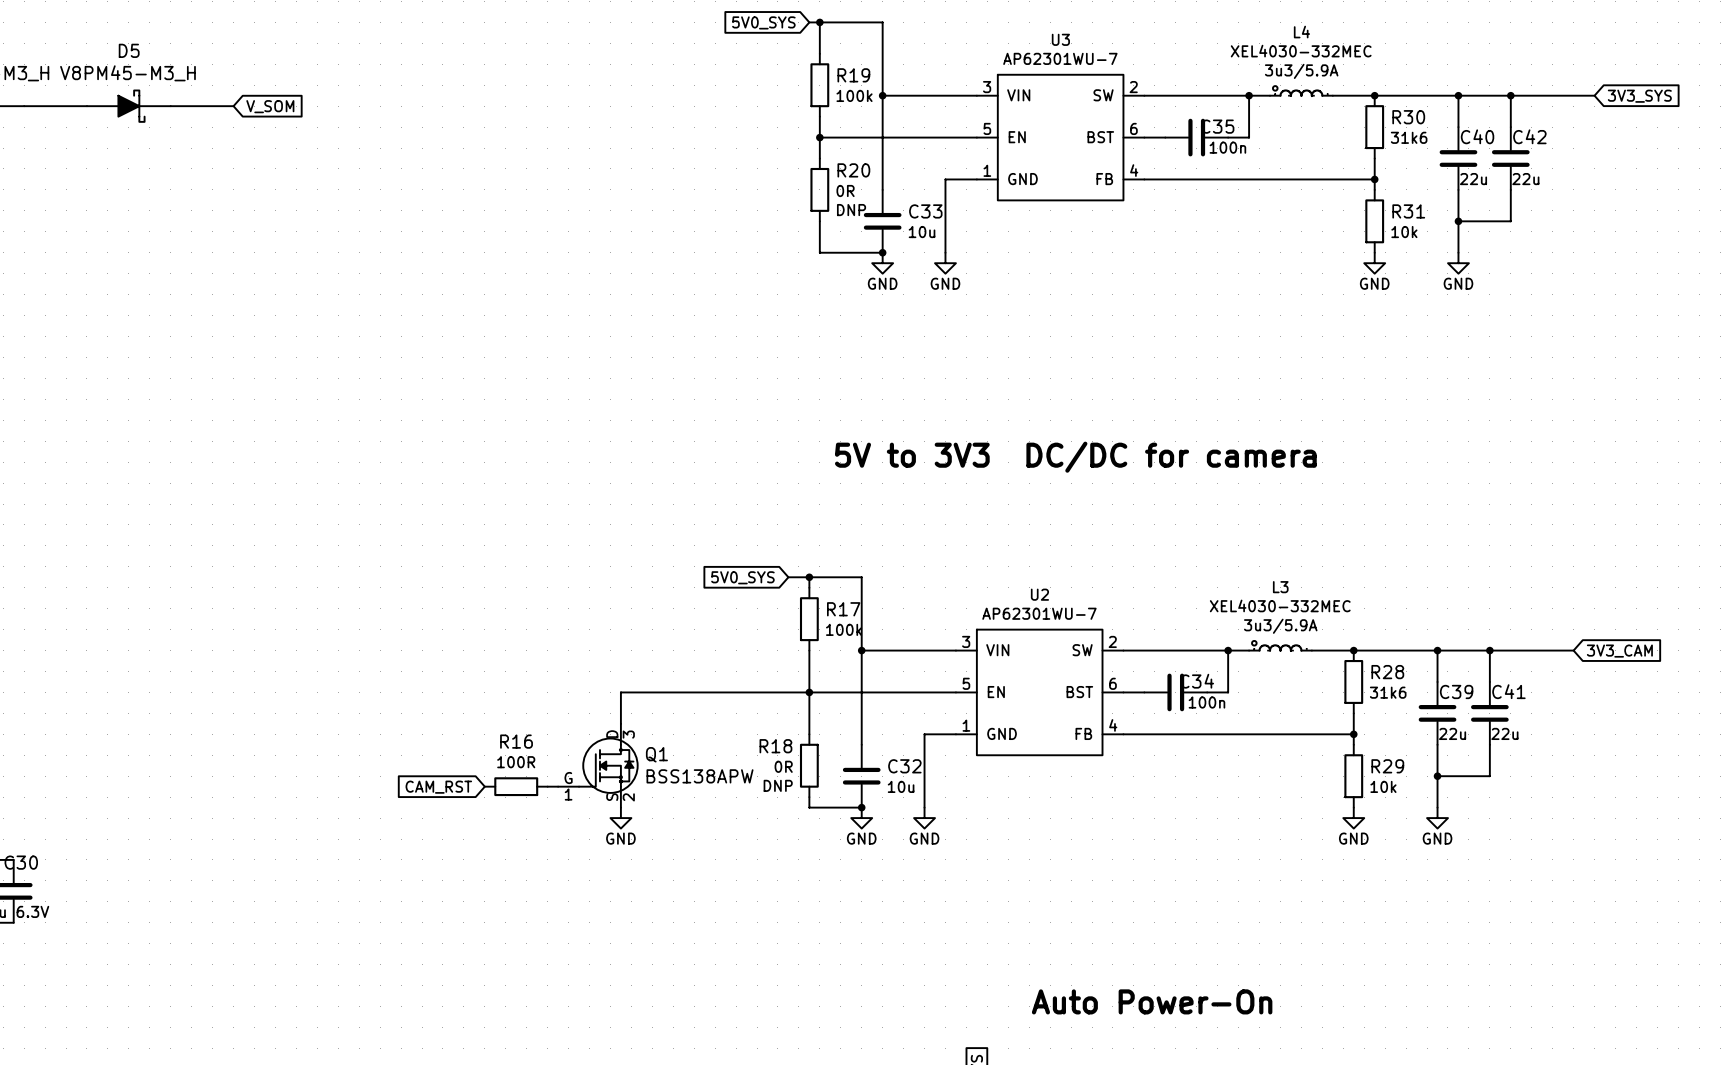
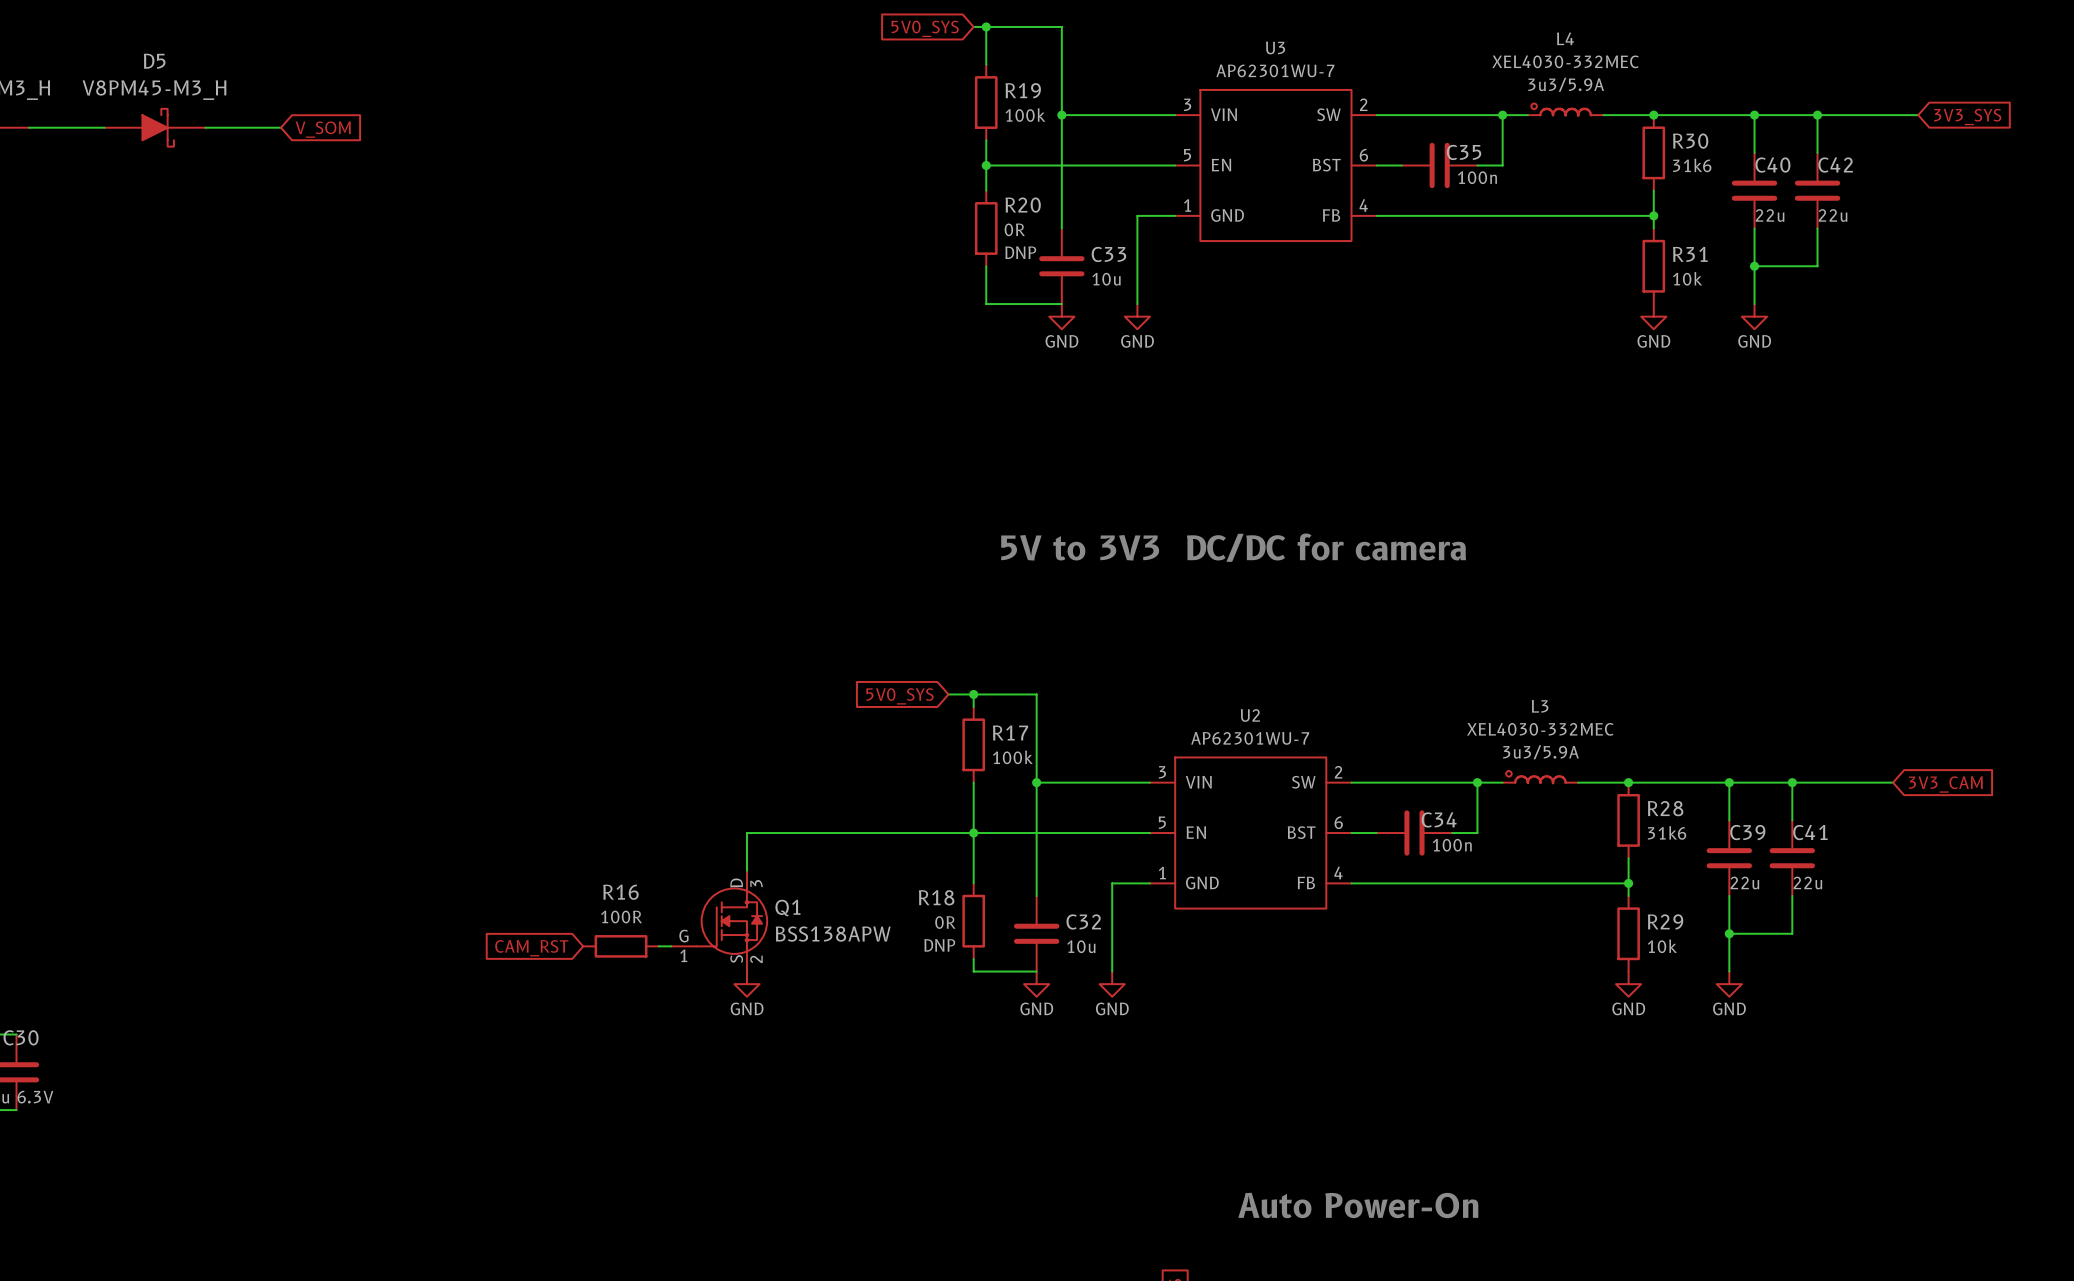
junction: (882, 252) -> none
junction: (861, 807) -> none

